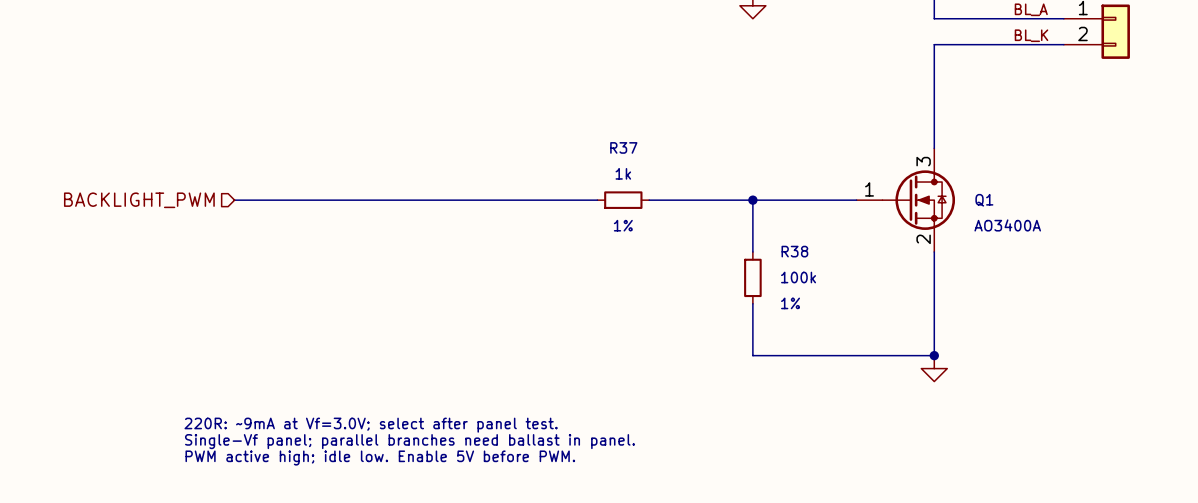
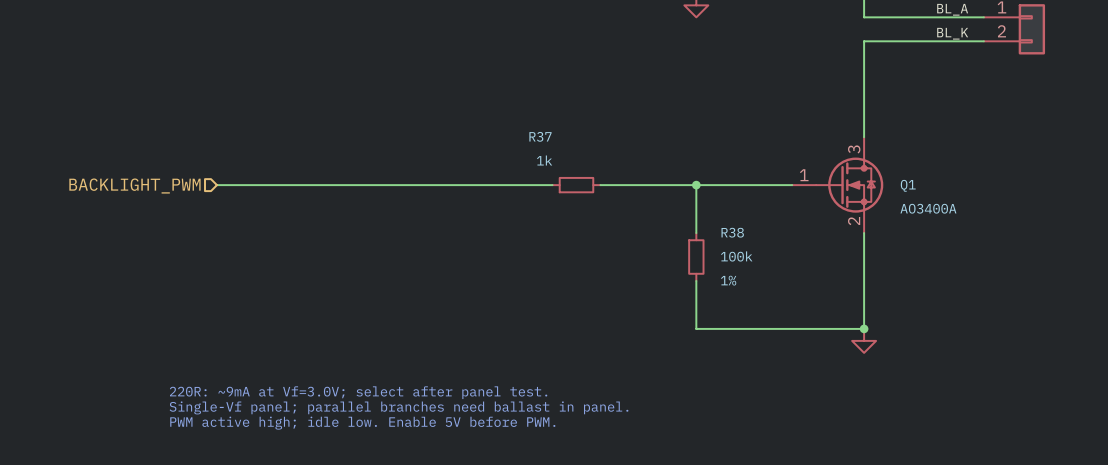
R37 name position: R37 (623, 147) -> R37 (540, 136)
R37 value position: 1k (623, 173) -> 1k (544, 160)
R37 text: 1% (623, 225) -> none

